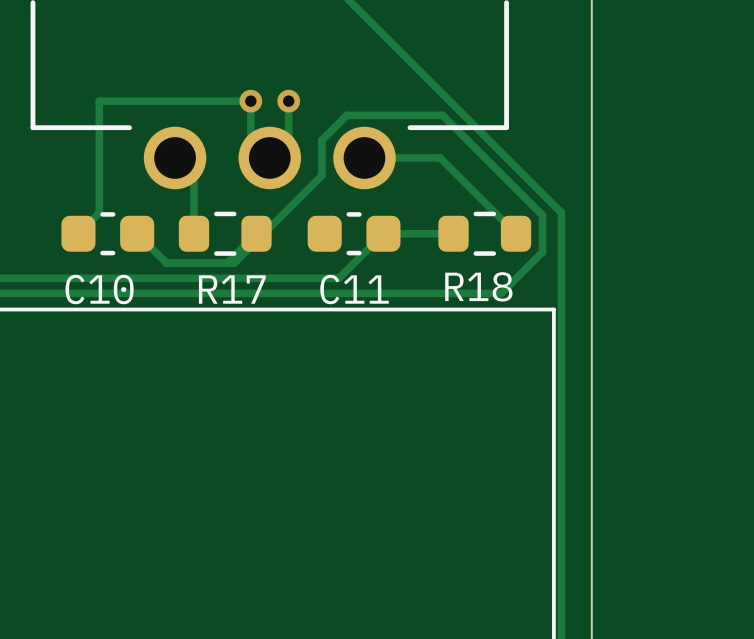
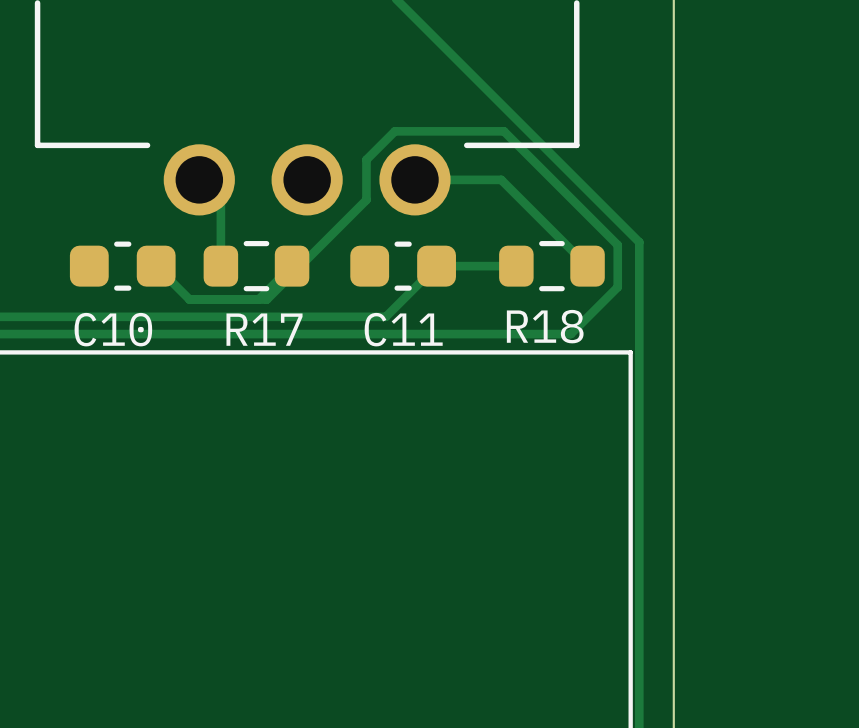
via: (250, 101) -> none
track: (288, 101) (288, 139) (269, 157) (250, 139) (250, 101) (99, 101) (99, 212) (78, 233) -> none
via: (288, 101) -> none

